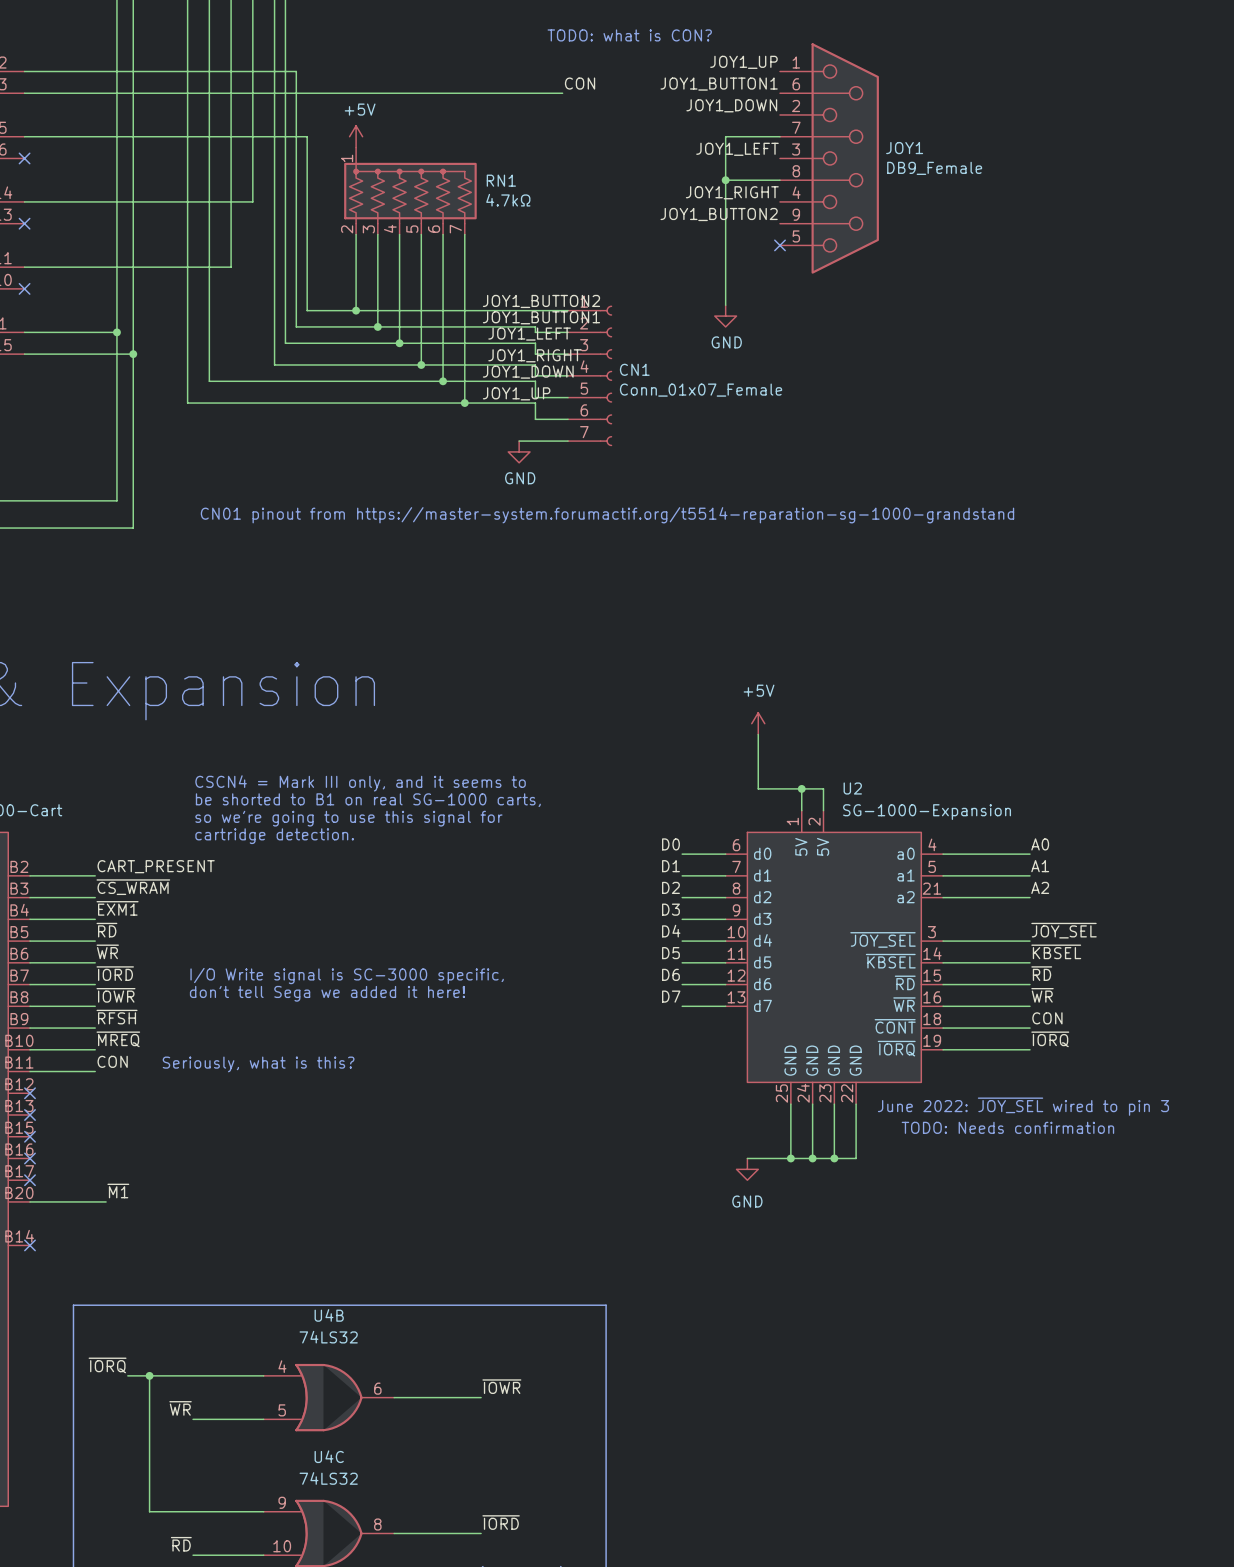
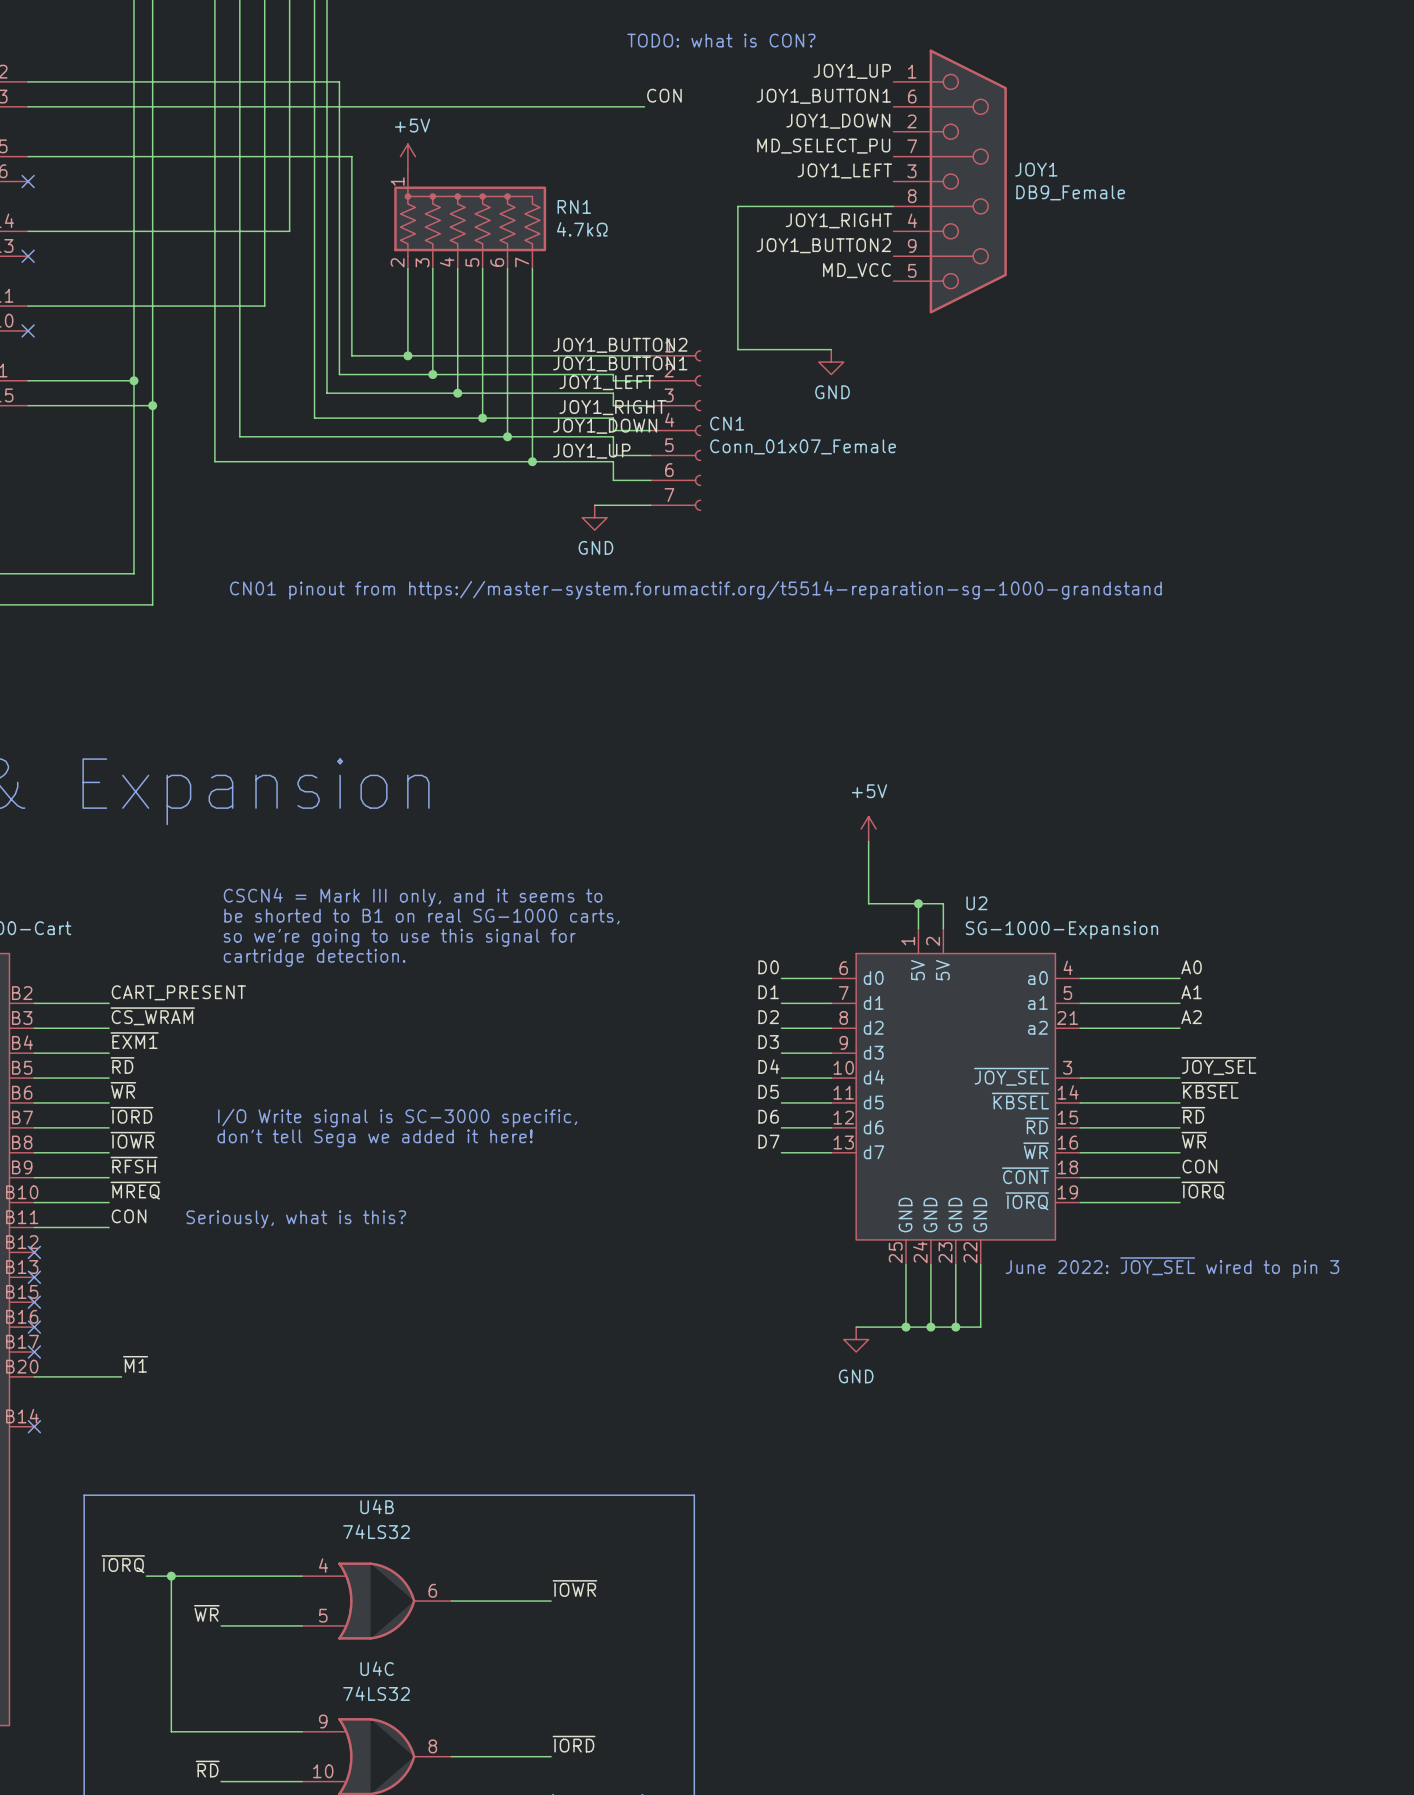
label: none -> MD_SELECT_PU (823, 146)
wire: (780, 136) (725, 136) (725, 305) -> (831, 206) (737, 206) (737, 349) (831, 349)
junction: (725, 180) -> none
label: none -> MD_VCC (856, 270)
no-connect mark: (780, 245) -> none
text: TODO: Needs confirmation (1007, 1127) -> none

